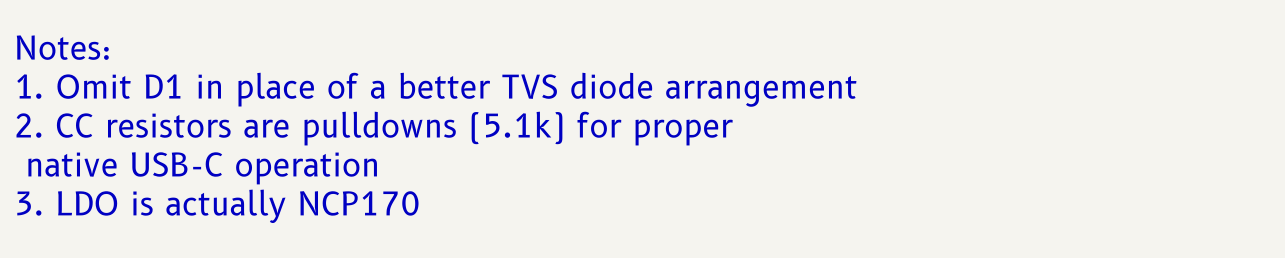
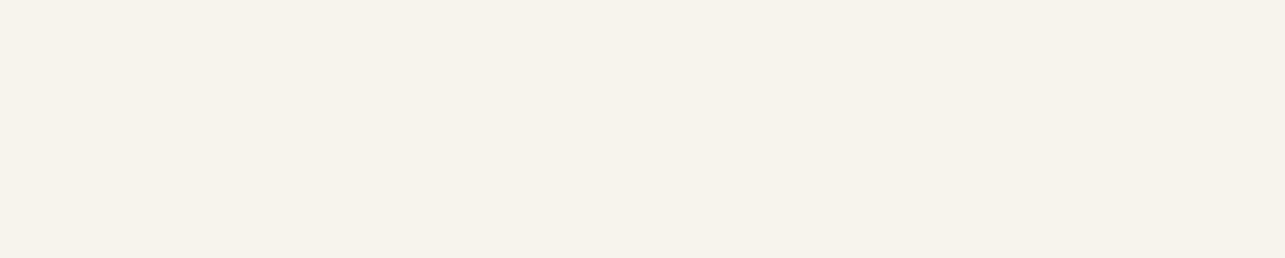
text: Notes: (62, 47) -> none
text: 1. Omit D1 in place of a better TVS diode arrangement (436, 89) -> none
text: 2. CC resistors are pulldowns (5.1k) for proper (374, 128) -> none
text: native USB-C operation (202, 168) -> none
text: 3. LDO is actually NCP170 (217, 206) -> none

